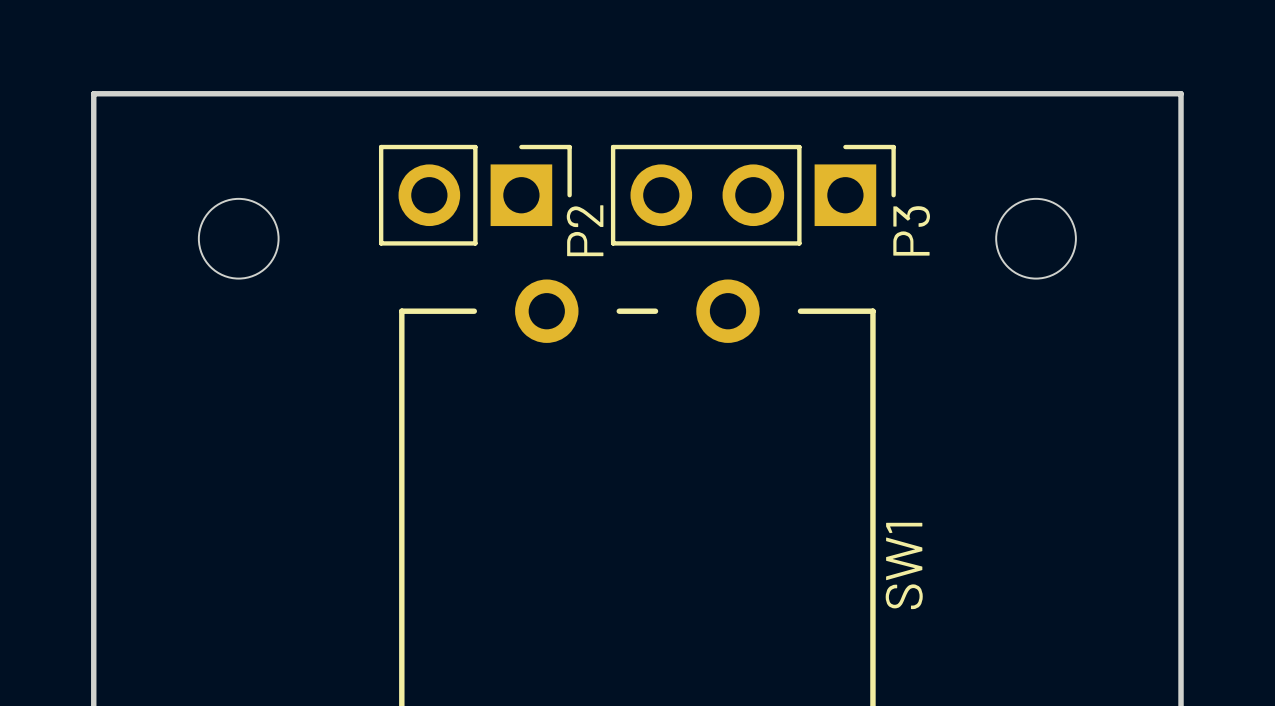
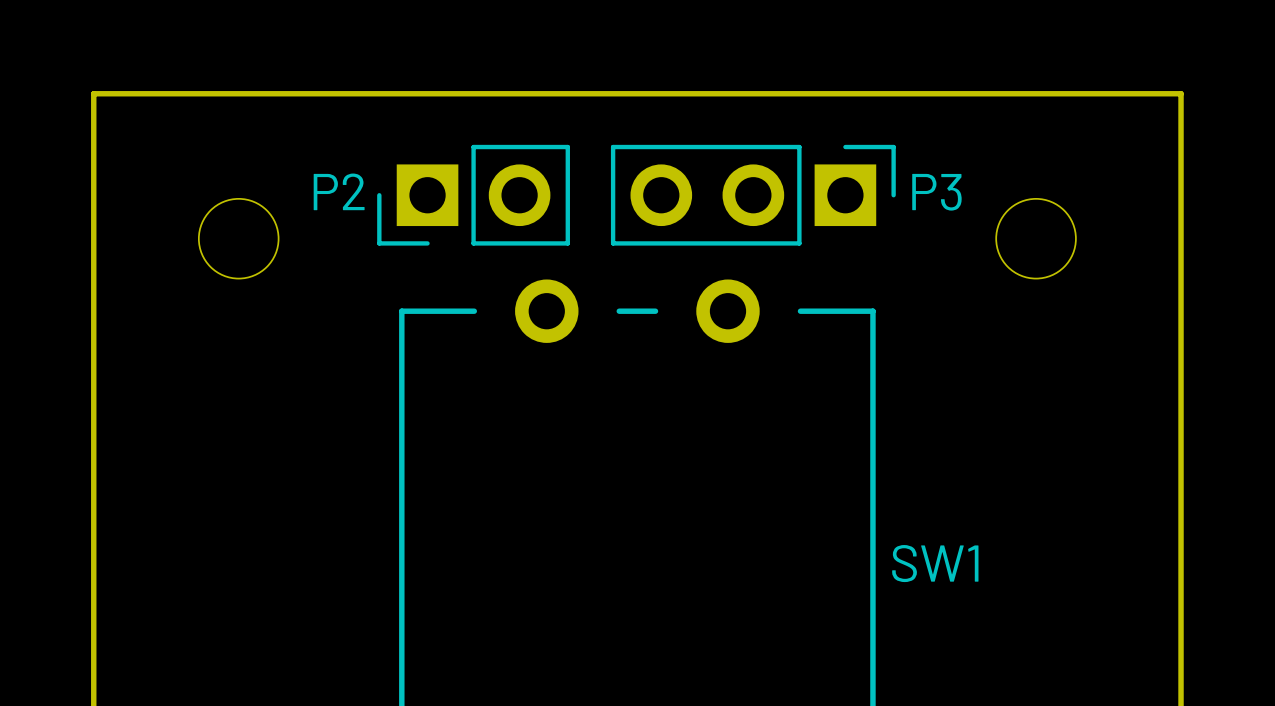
P2 rotation: 0° (475, 195) -> 180° (473, 195)
P3 name rotation: 0° (911, 230) -> 90° clockwise (936, 192)
SW1 name rotation: 0° (904, 565) -> 90° clockwise (935, 563)

